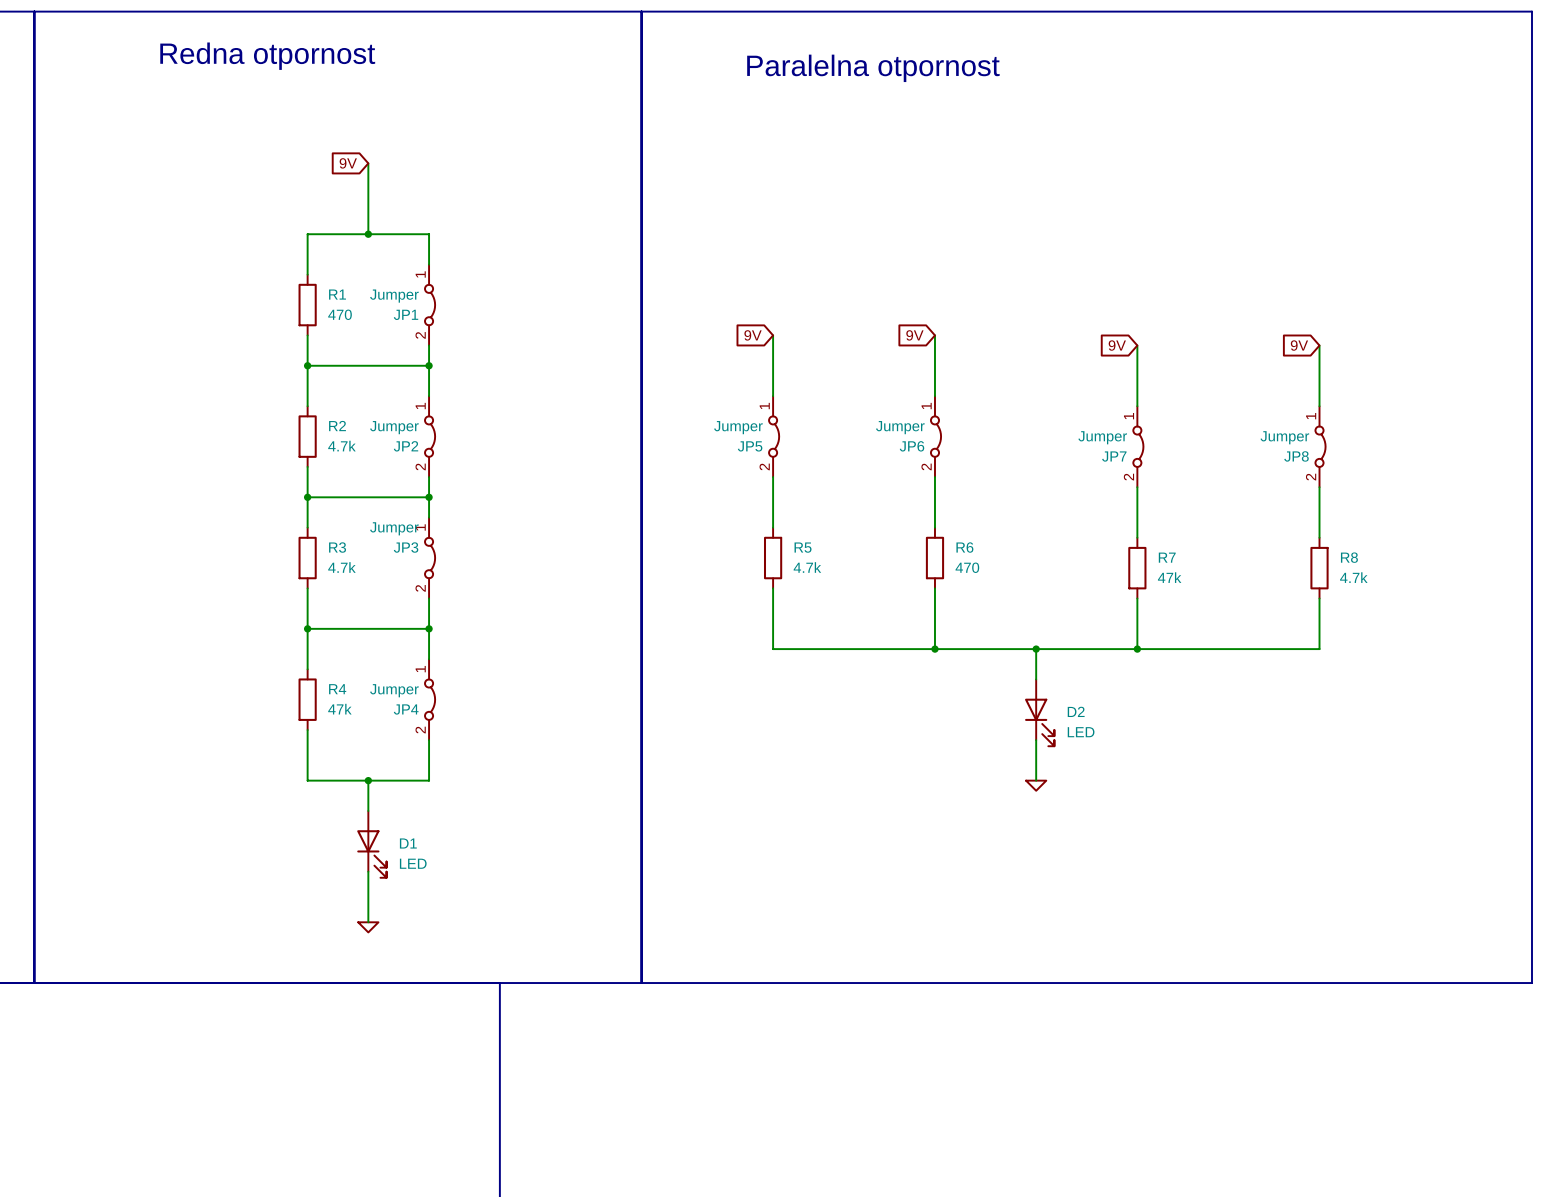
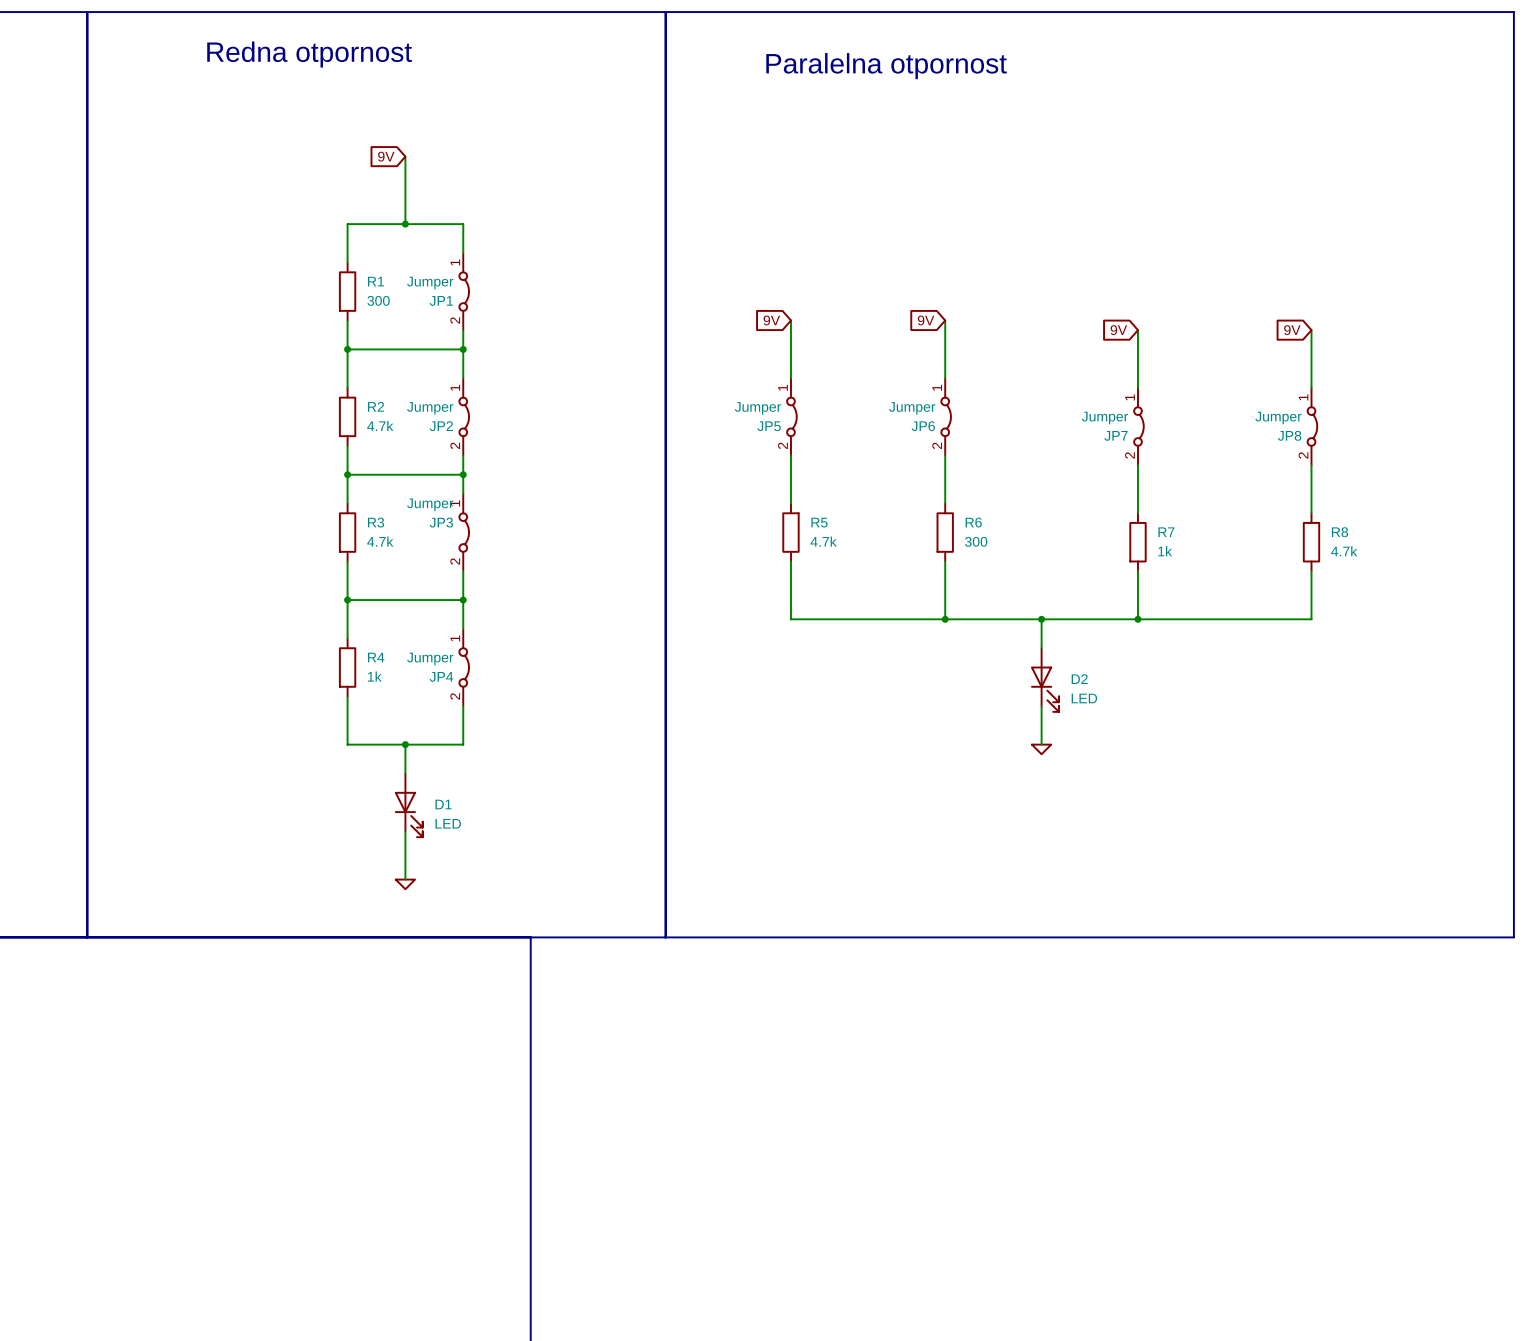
R1 value: 470 (340, 314) -> 300 (378, 300)
R6 value: 470 (967, 567) -> 300 (976, 541)
R7 value: 47k (1169, 577) -> 1k (1165, 551)
R4 value: 47k (339, 709) -> 1k (374, 676)

